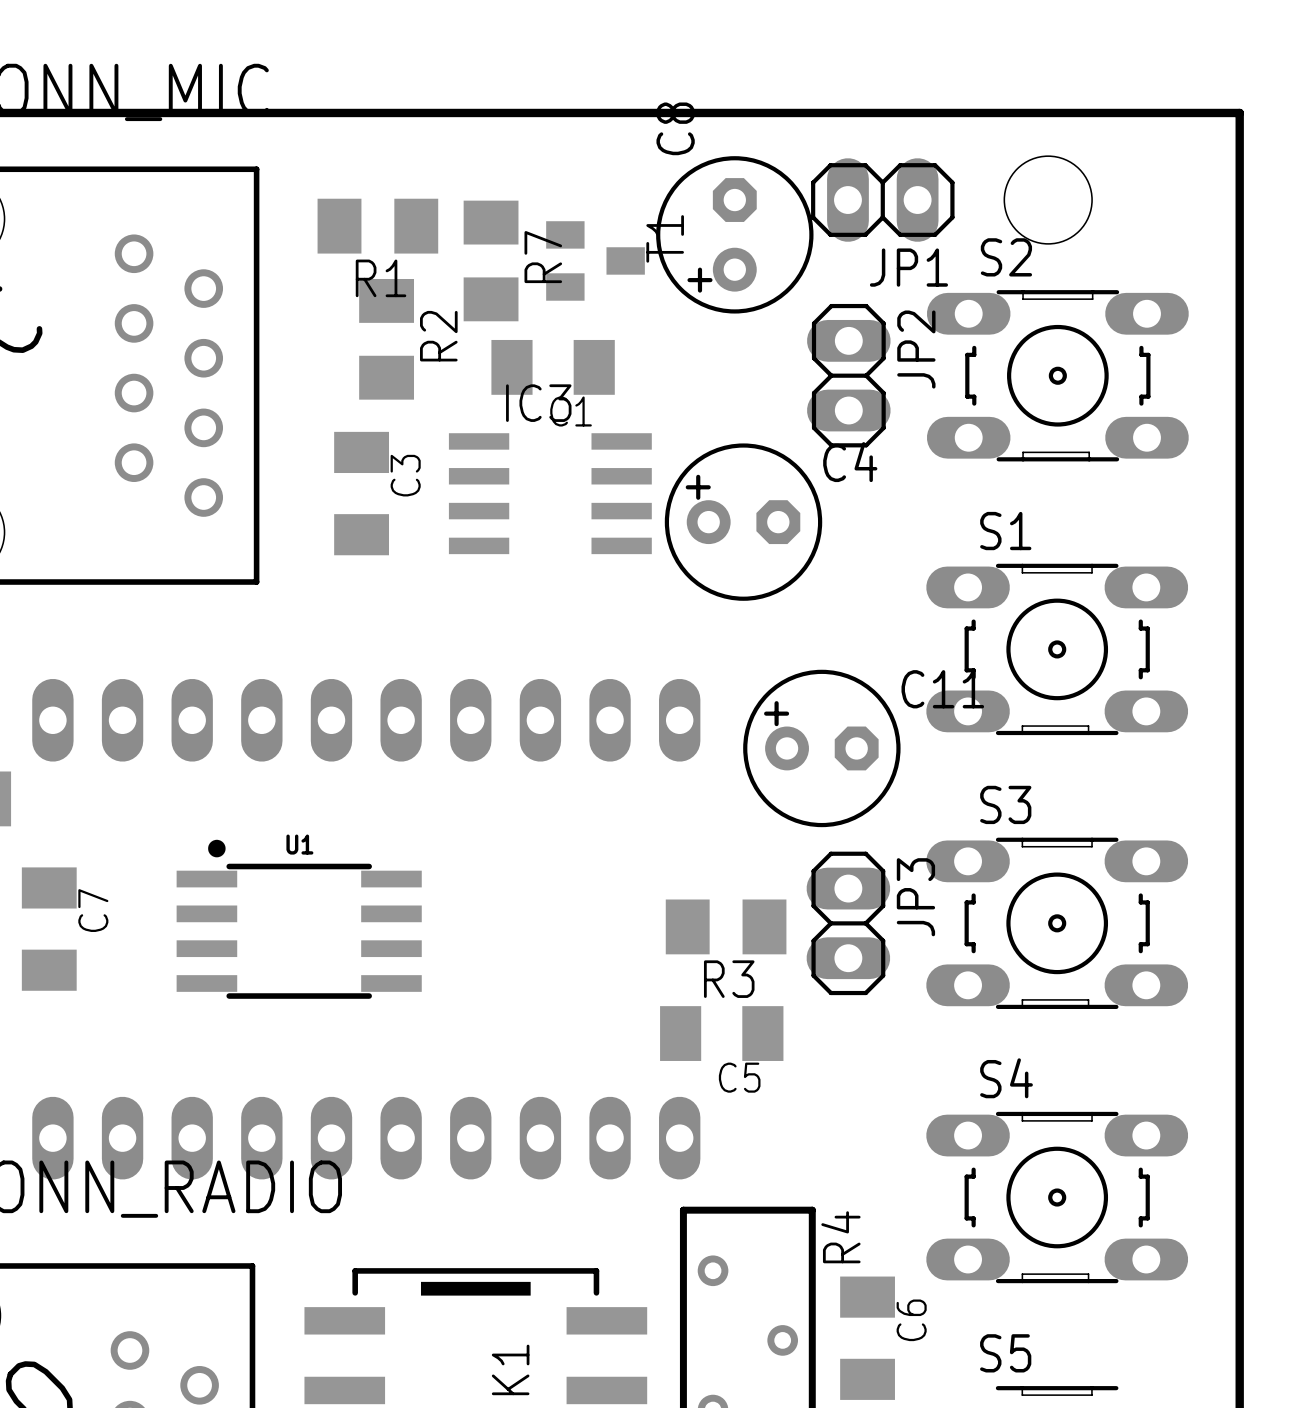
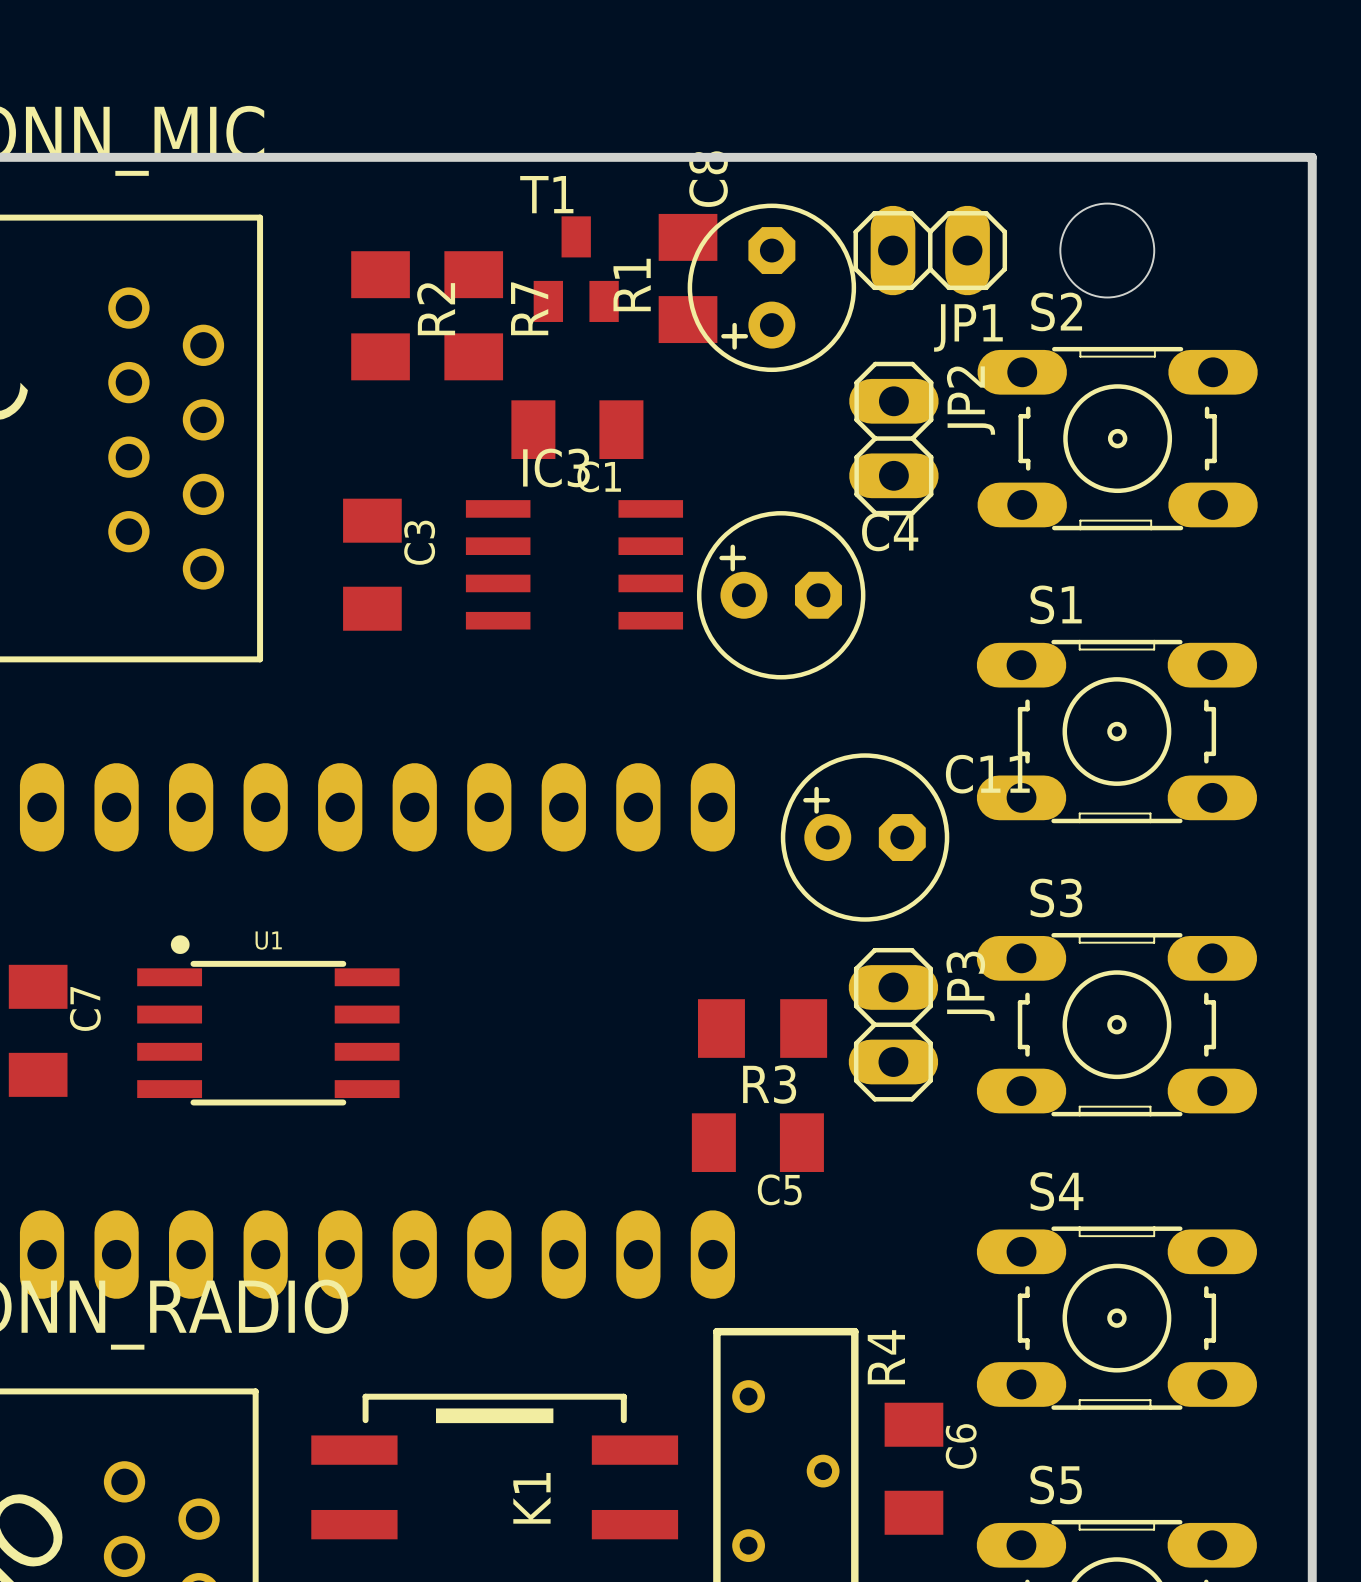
R1 rotation: 0° (377, 226) -> 90° clockwise (688, 278)
R1 position: (377, 226) -> (688, 278)
R7 position: (491, 260) -> (473, 315)
T1 rotation: 0° (595, 260) -> 90° counterclockwise (576, 269)
T1 position: (595, 260) -> (576, 269)
R2 position: (386, 339) -> (380, 315)
U1 position: (299, 919) -> (268, 1020)

